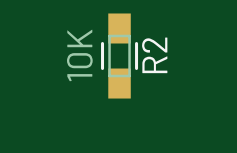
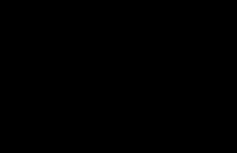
R2: 10K (119, 56) -> none

